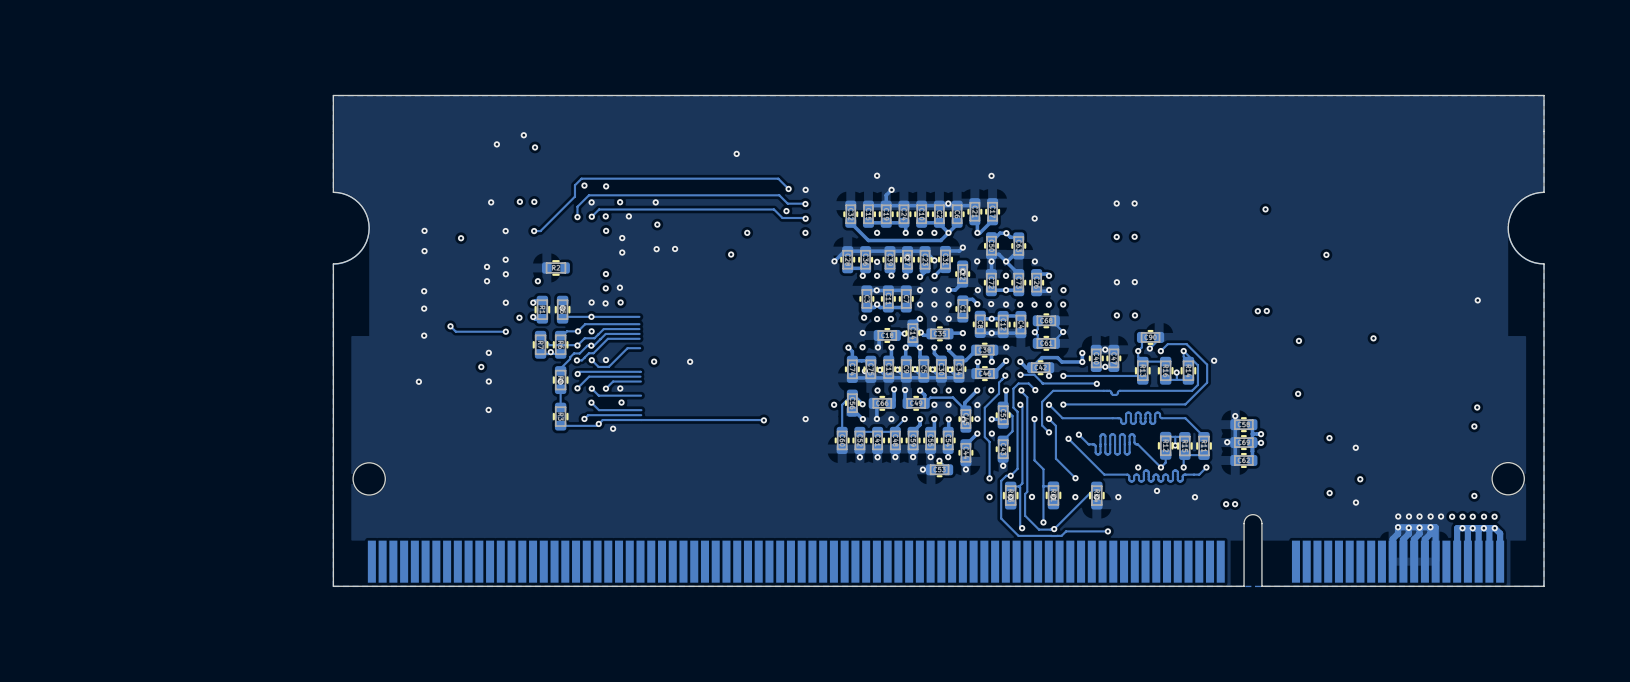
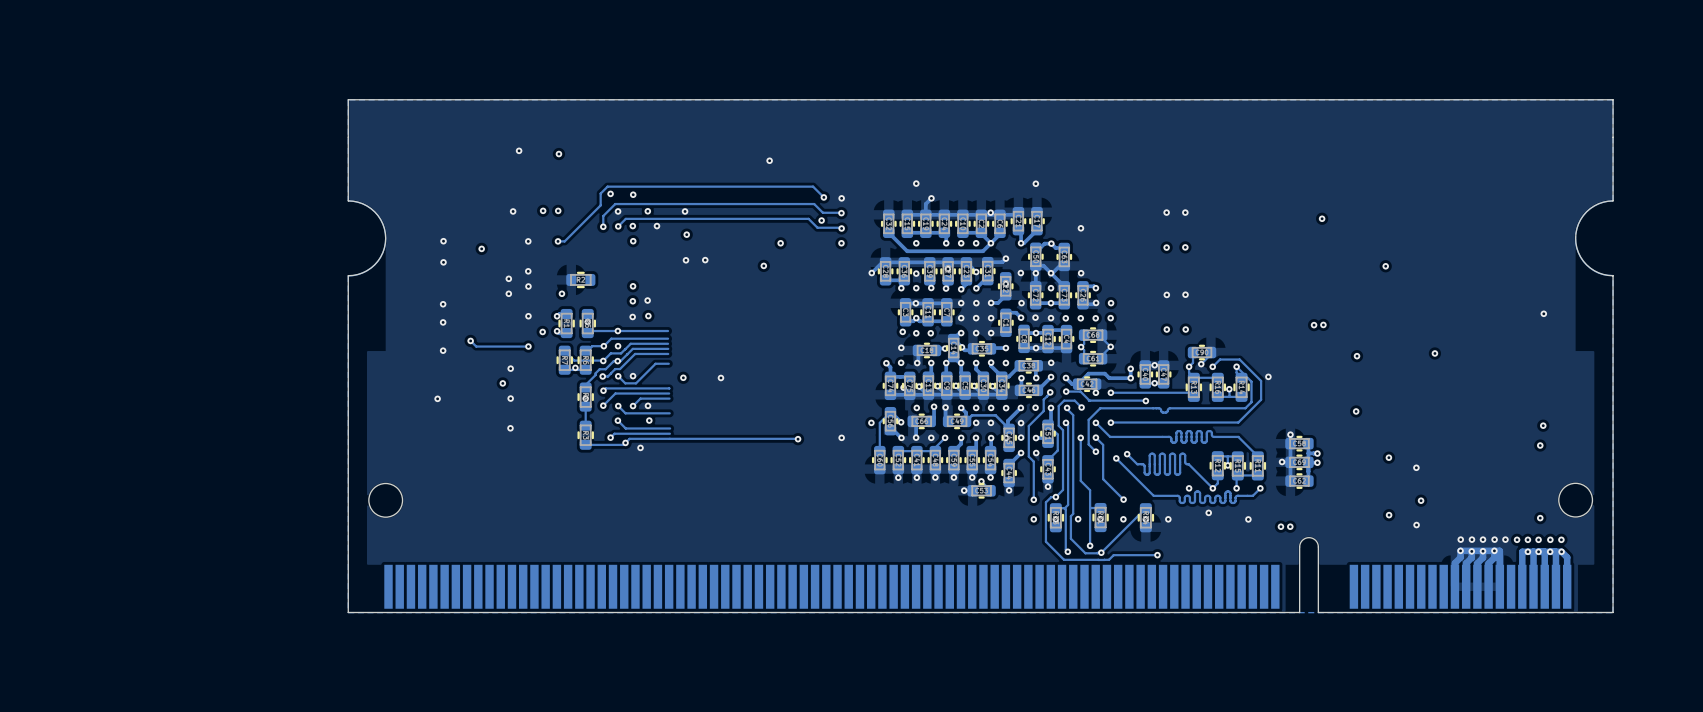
via: (523, 135) -> none
via: (622, 238) -> none
via: (622, 252) -> none
via: (591, 302) -> none

